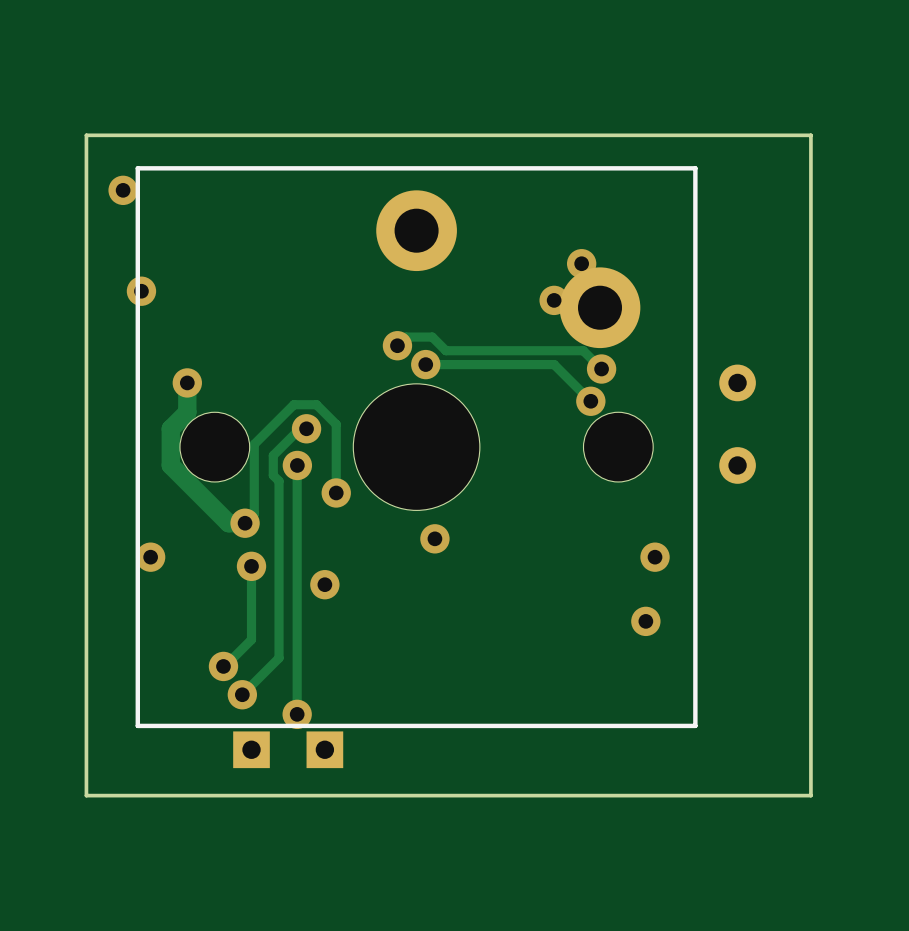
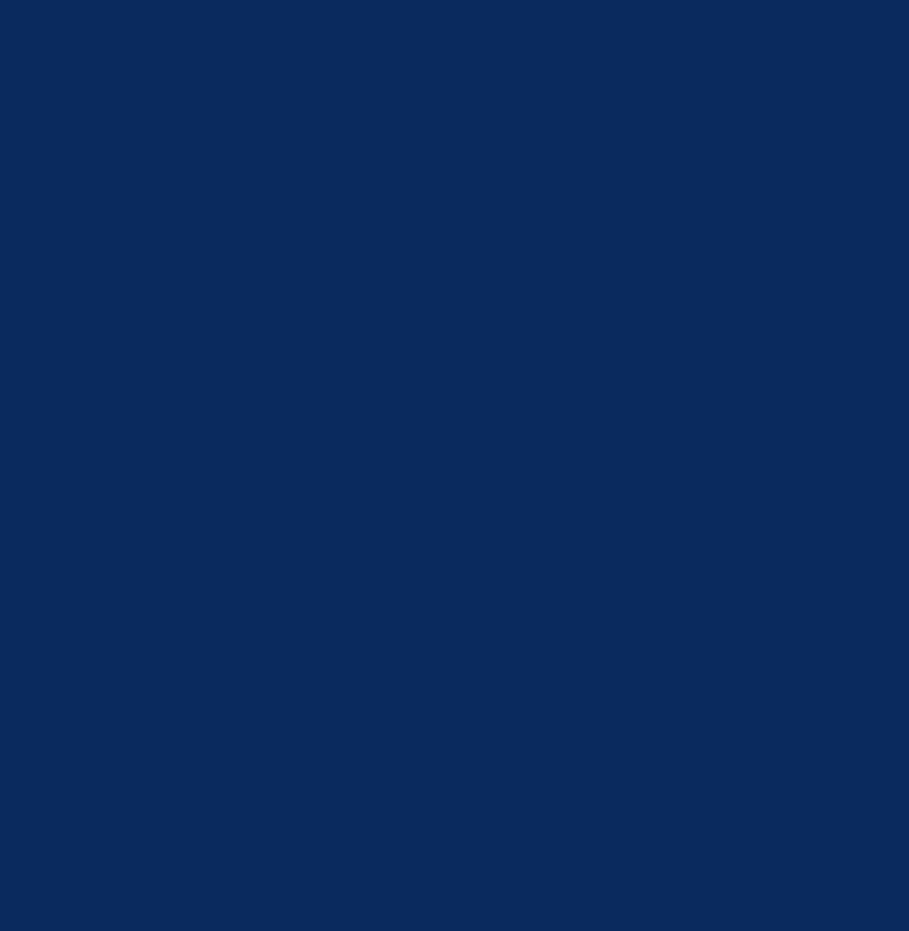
board edge: (810, 135) (86, 135) (86, 795) (810, 795) (810, 135) -> none
via: (123, 190) -> none
via: (581, 263) -> none
via: (141, 291) -> none
via: (554, 300) -> none
track: (397, 345) (406, 337) (432, 337) (445, 350) (583, 350) (601, 369) -> none
via: (397, 345) -> none
track: (425, 364) (554, 364) (590, 401) -> none
via: (425, 364) -> none
via: (601, 369) -> none
track: (187, 382) (187, 412) (170, 428) (170, 465) (228, 523) (245, 523) (254, 514) (254, 444) (293, 404) (316, 404) (336, 424) (336, 492) -> none
via: (187, 382) -> none
part: (737, 382) -> none
via: (590, 401) -> none
track: (306, 428) (300, 428) (273, 455) (273, 475) (279, 481) (279, 658) (242, 694) -> none
via: (306, 428) -> none
part: (416, 447) -> none
track: (297, 465) (297, 714) -> none
via: (297, 465) -> none
part: (737, 465) -> none
via: (336, 492) -> none
via: (245, 523) -> none
via: (434, 538) -> none
via: (150, 557) -> none
via: (655, 557) -> none
track: (251, 566) (251, 639) (223, 666) -> none
via: (251, 566) -> none
via: (324, 584) -> none
via: (645, 621) -> none
via: (223, 666) -> none
via: (242, 694) -> none
via: (297, 714) -> none
part: (251, 749) -> none
part: (324, 749) -> none

